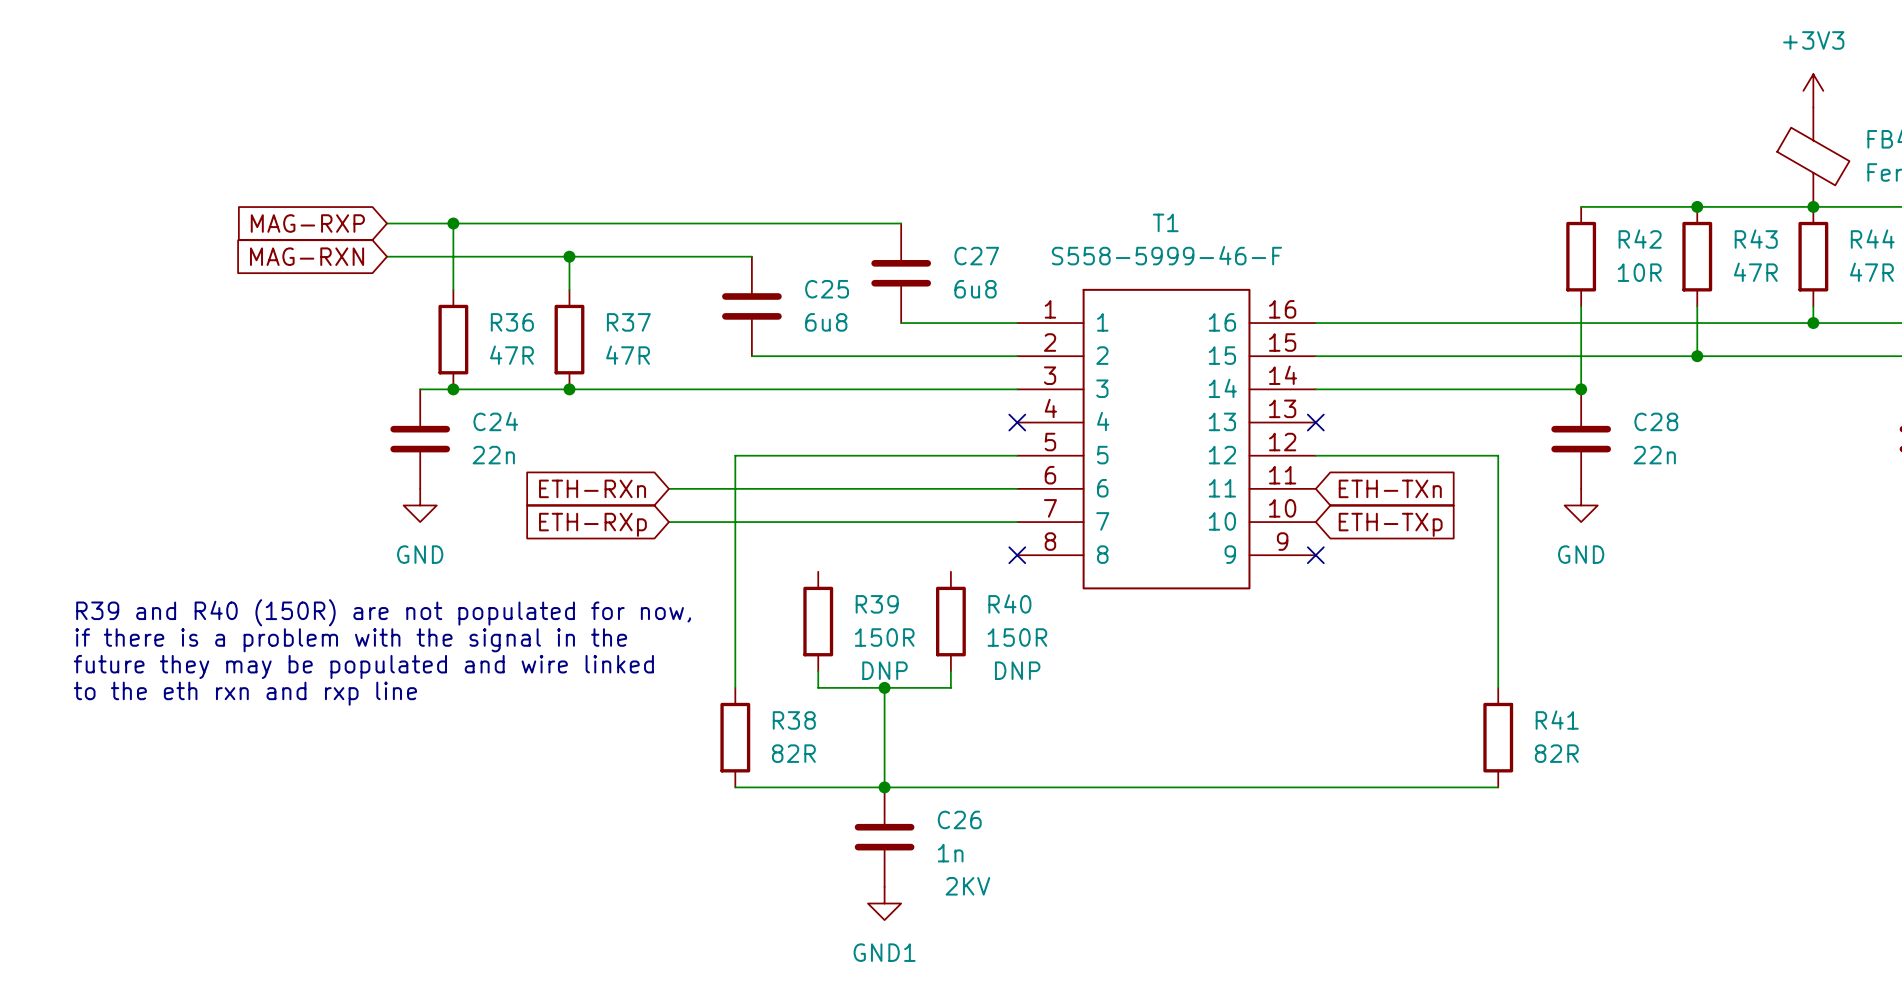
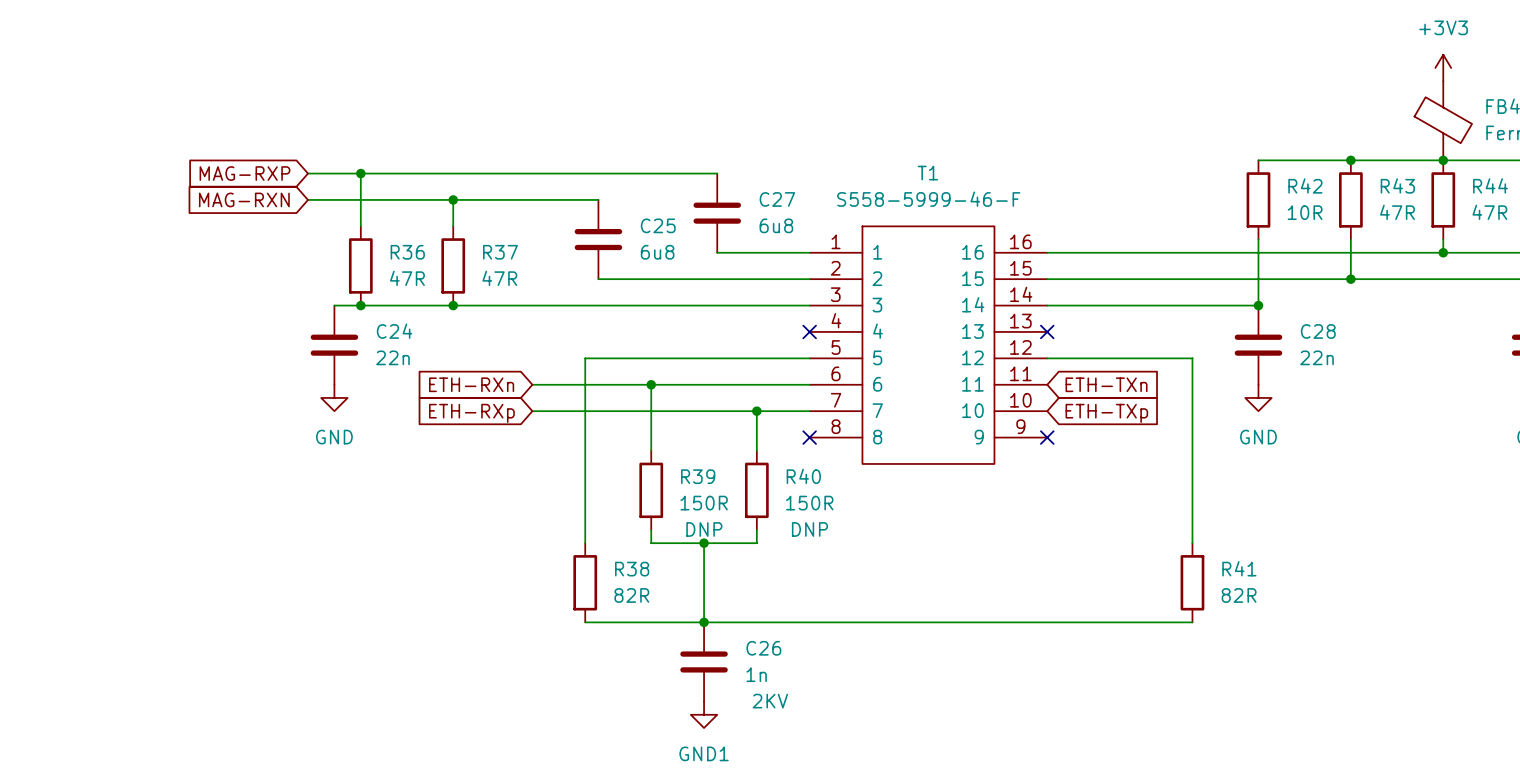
wire: none -> (651, 384) (651, 450)
junction: none -> (651, 384)
wire: none -> (756, 411) (756, 450)
junction: none -> (756, 411)
text: R39 and R40 (150R) are not populated for now, (383, 612) -> none
text: if there is a problem with the signal in the (351, 640) -> none
text: future they may be populated and wire linked (363, 666) -> none
text: to the eth rxn and rxp line (245, 693) -> none

